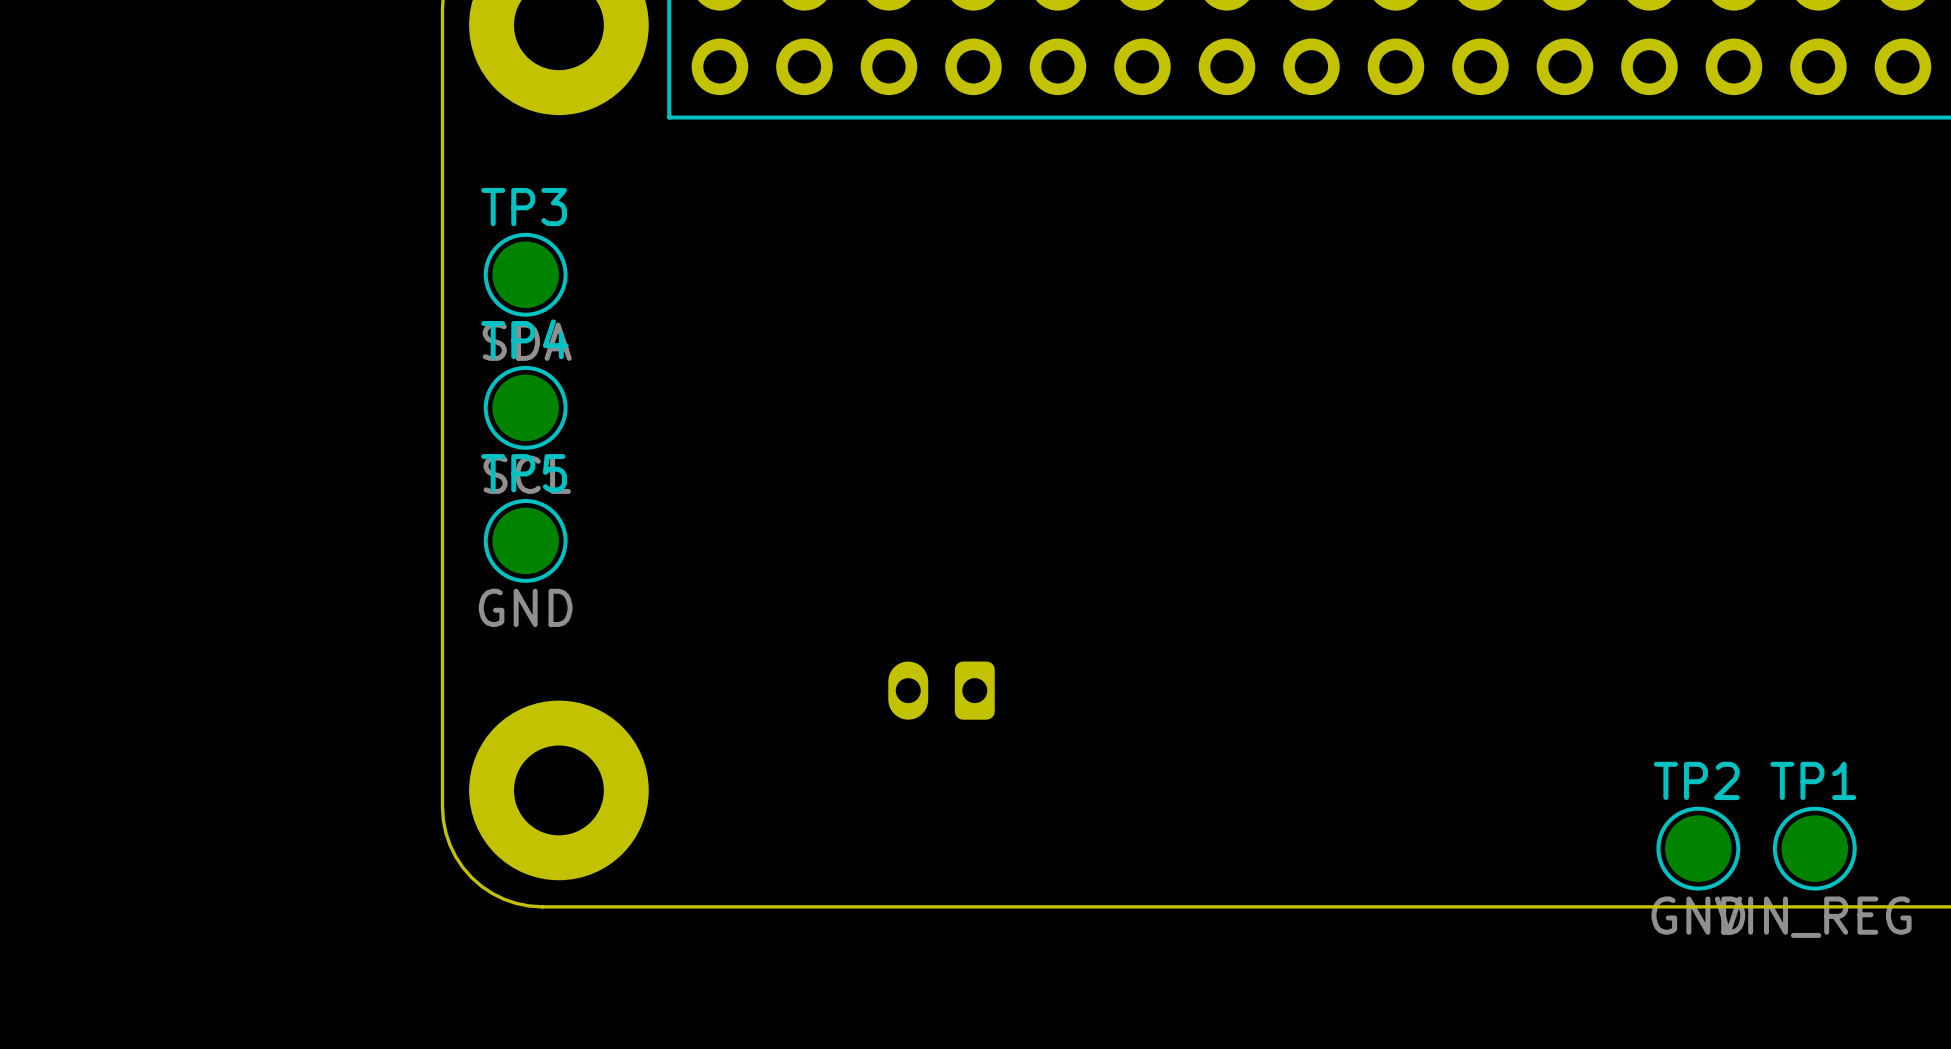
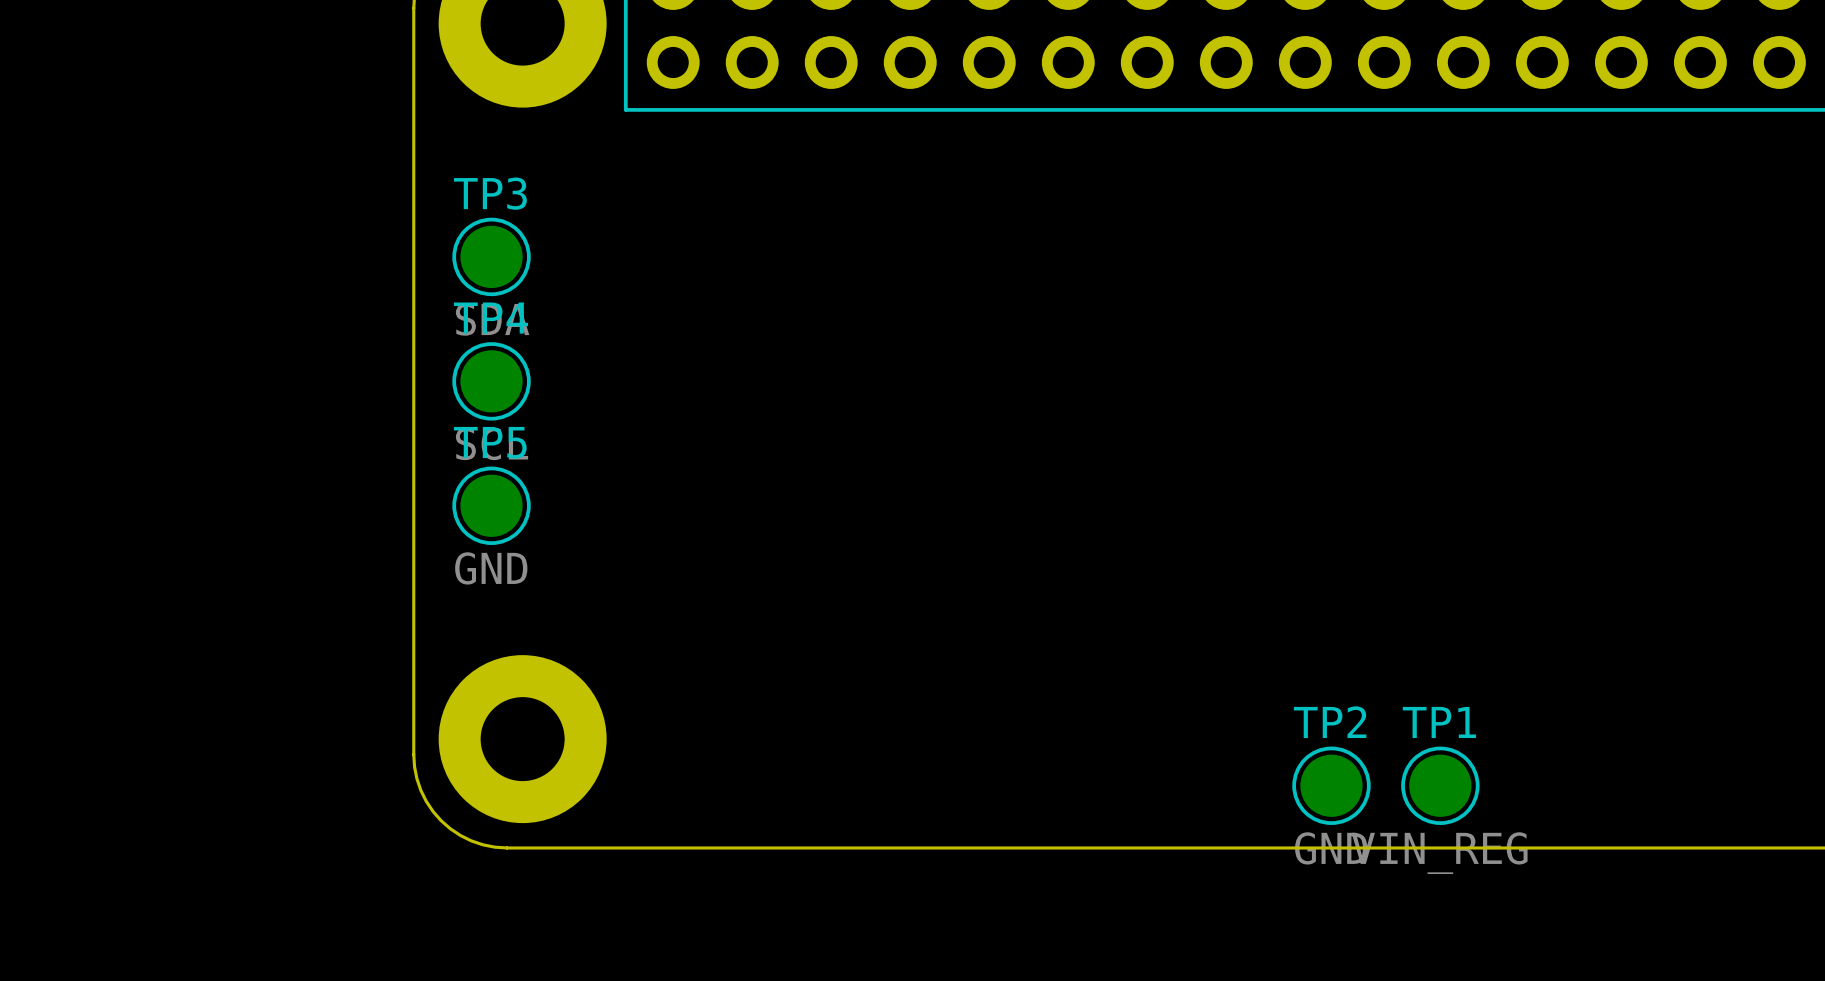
part: (941, 690) -> none
TP2 position: (1698, 848) -> (1331, 785)
TP1 position: (1814, 848) -> (1440, 785)

